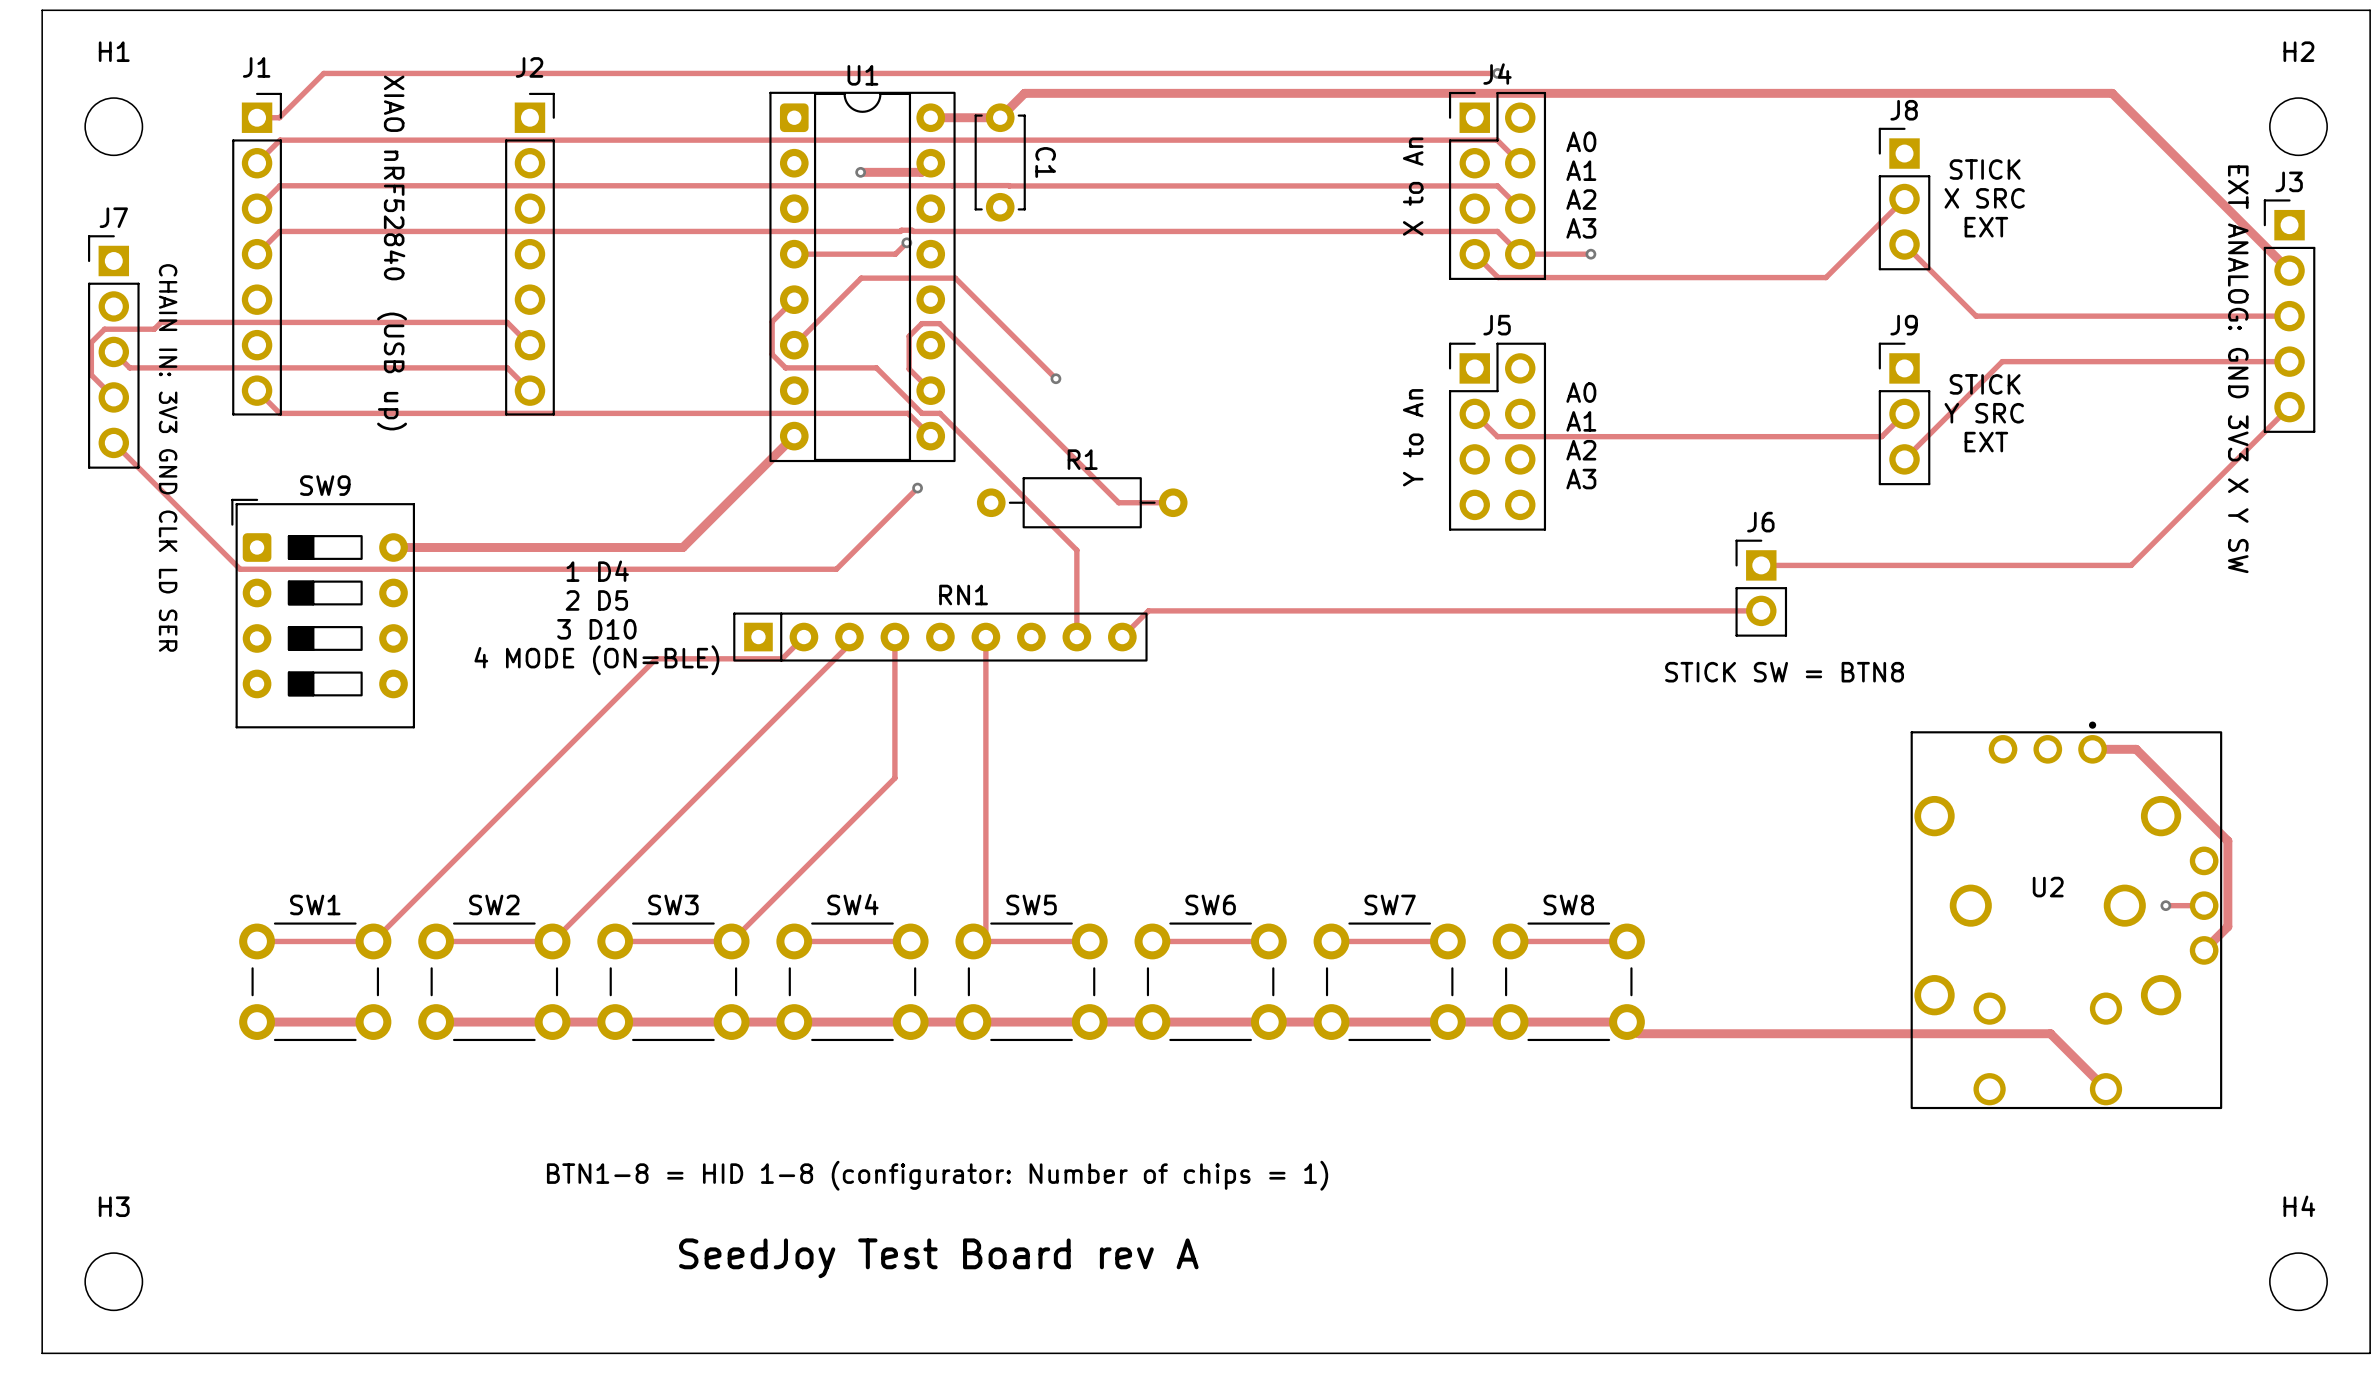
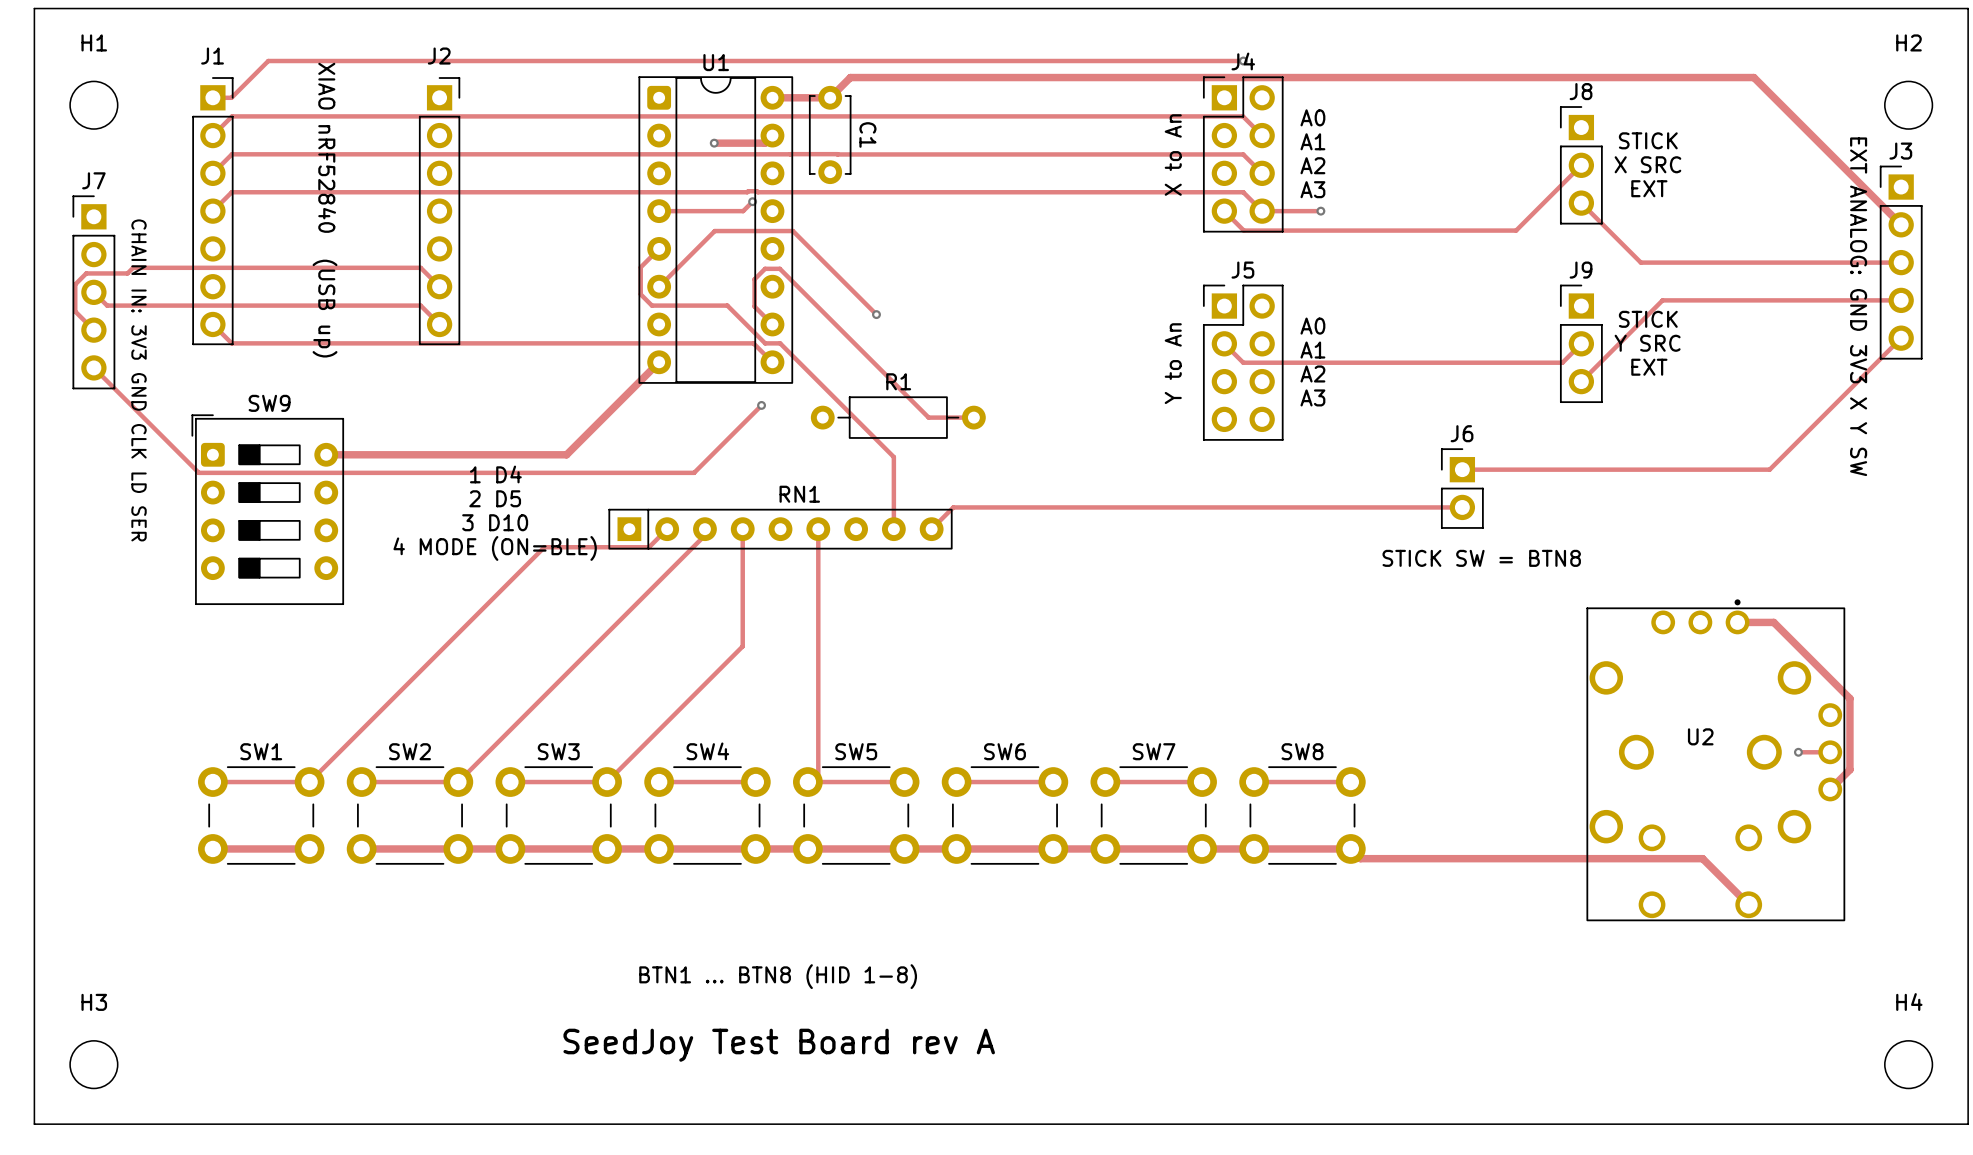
text: BTN1-8 = HID 1-8 (configurator: Number of chips = 1) (937, 1175) -> BTN1 ... BTN8 (HID 1-8) (778, 976)

